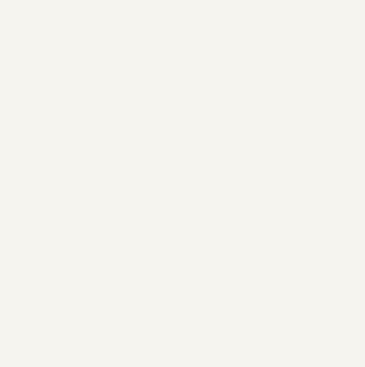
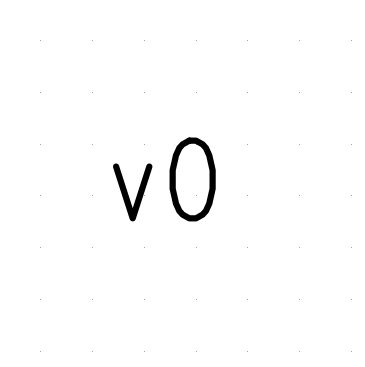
text: none -> v0 (164, 179)

